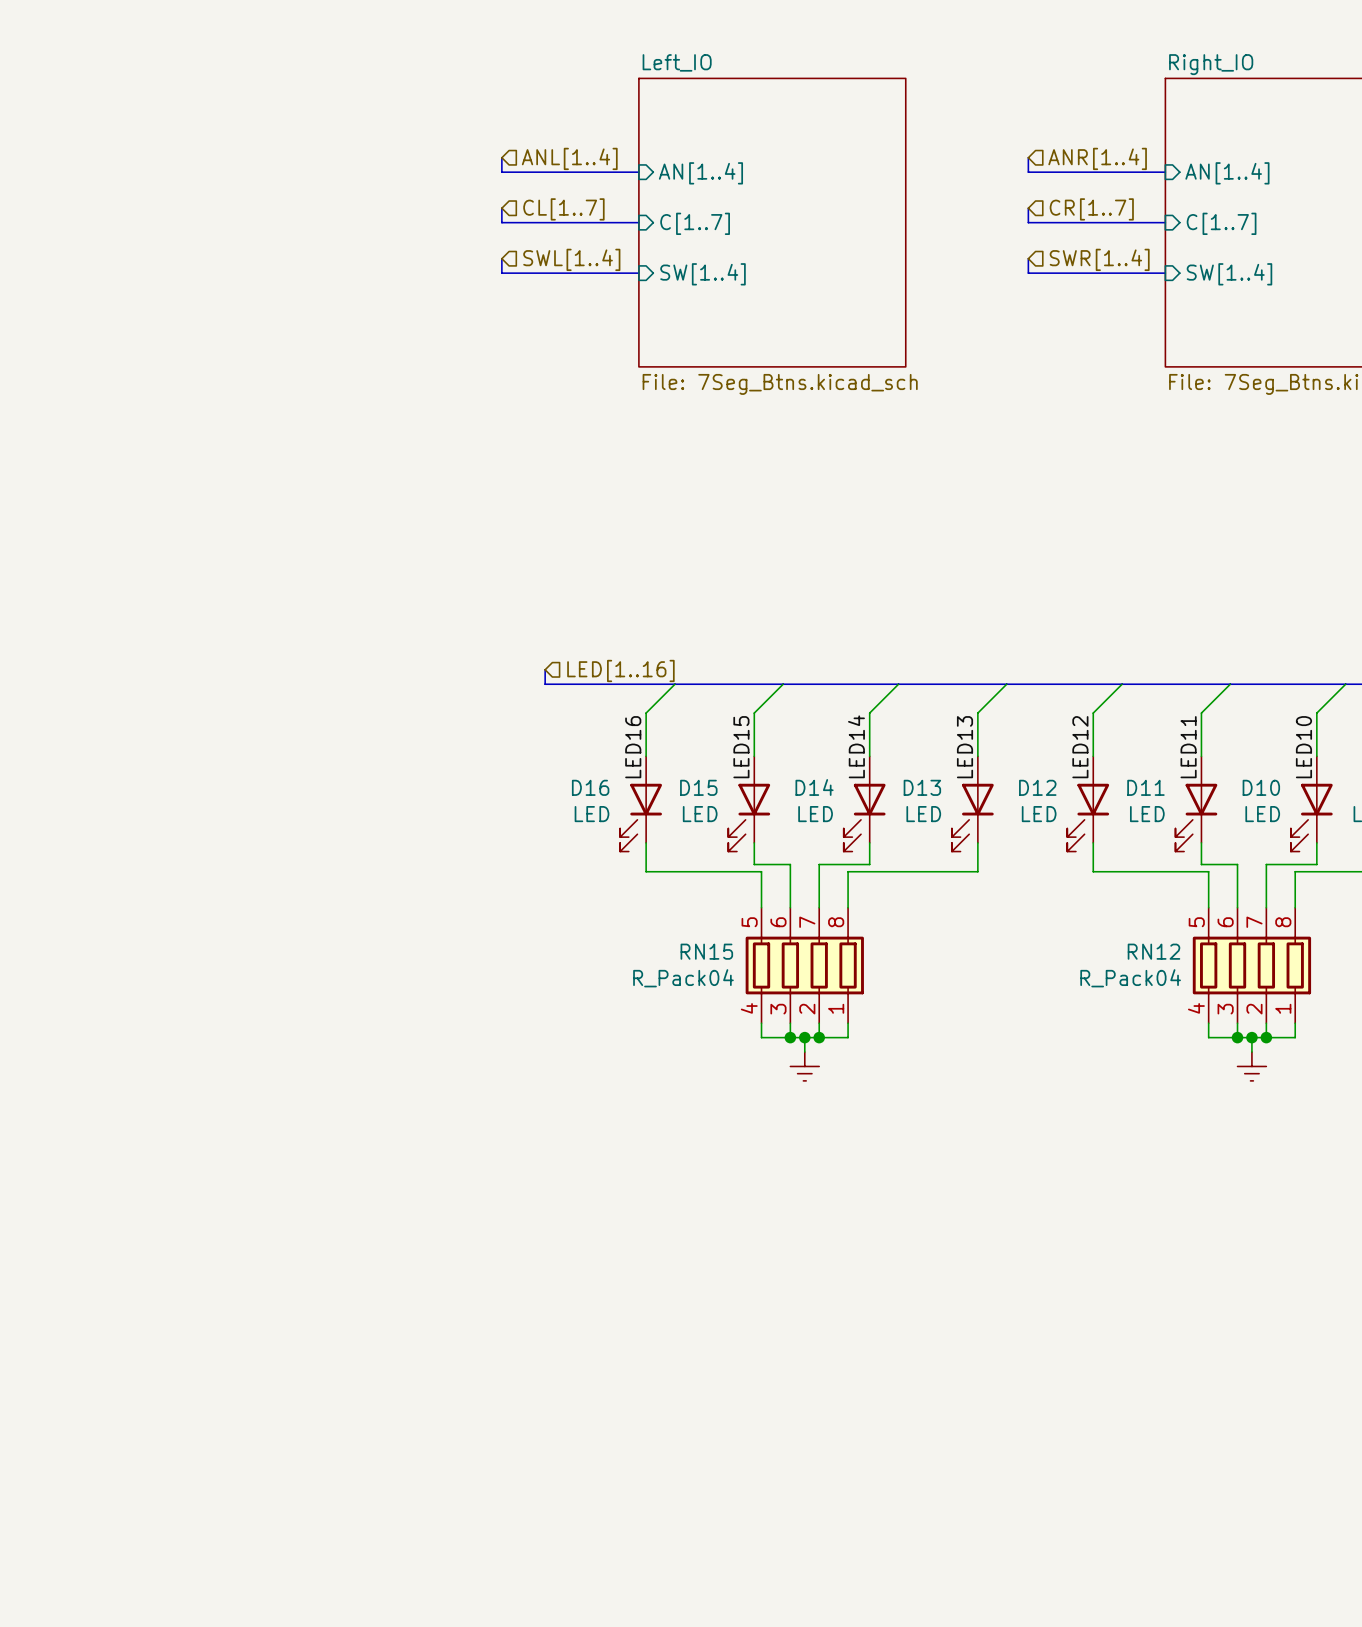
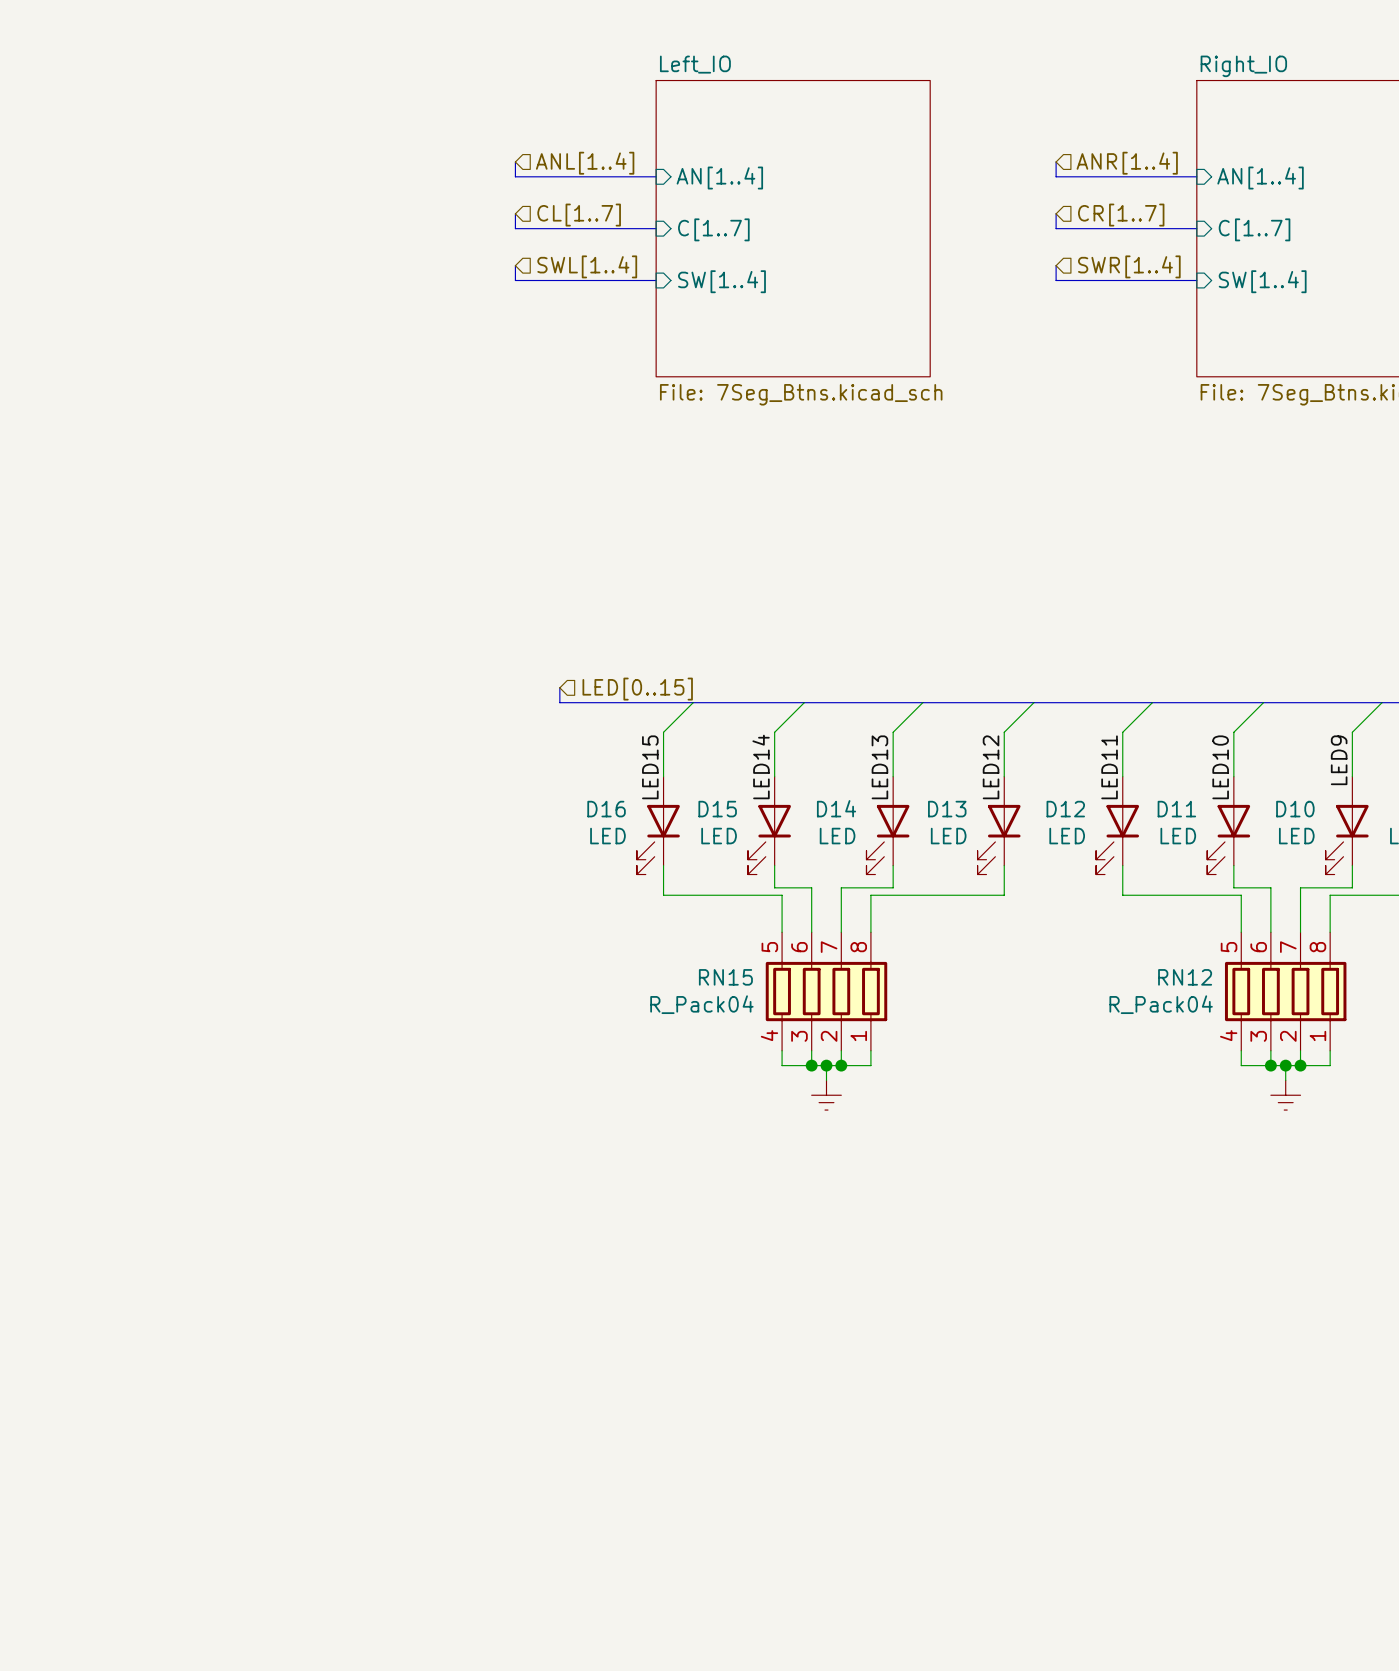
hierarchical label: LED[1..16] (620, 670) -> LED[0..15] (637, 689)
label: LED14 (856, 746) -> LED13 (879, 767)
label: LED16 (633, 747) -> LED15 (650, 767)
label: LED15 (741, 747) -> LED14 (761, 766)
label: LED13 (965, 747) -> LED12 (991, 767)
label: LED12 (1080, 747) -> LED11 (1109, 767)
label: LED11 (1188, 747) -> LED10 (1220, 767)
label: LED10 (1303, 747) -> LED9 (1339, 760)

